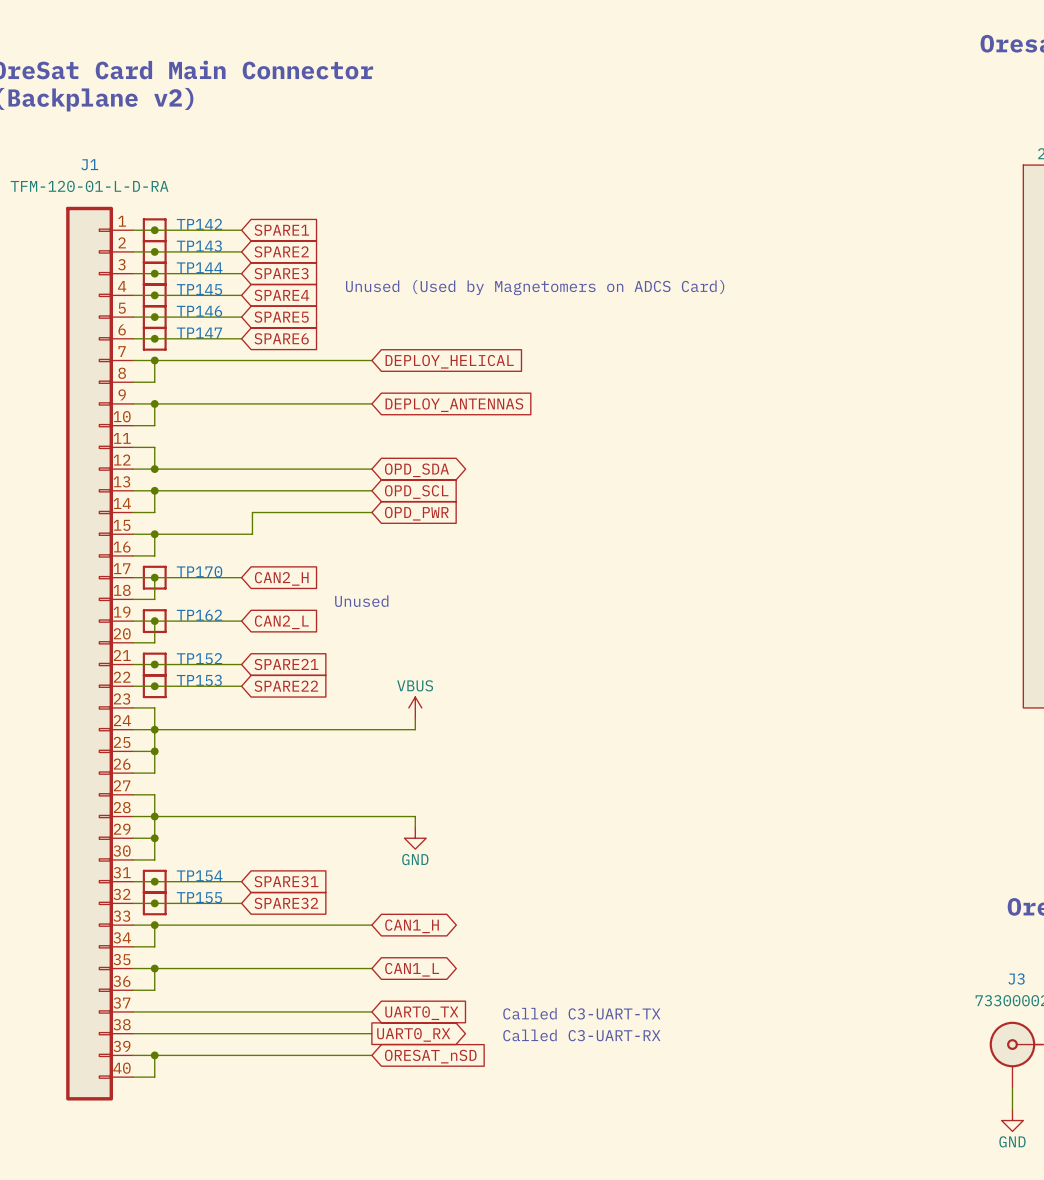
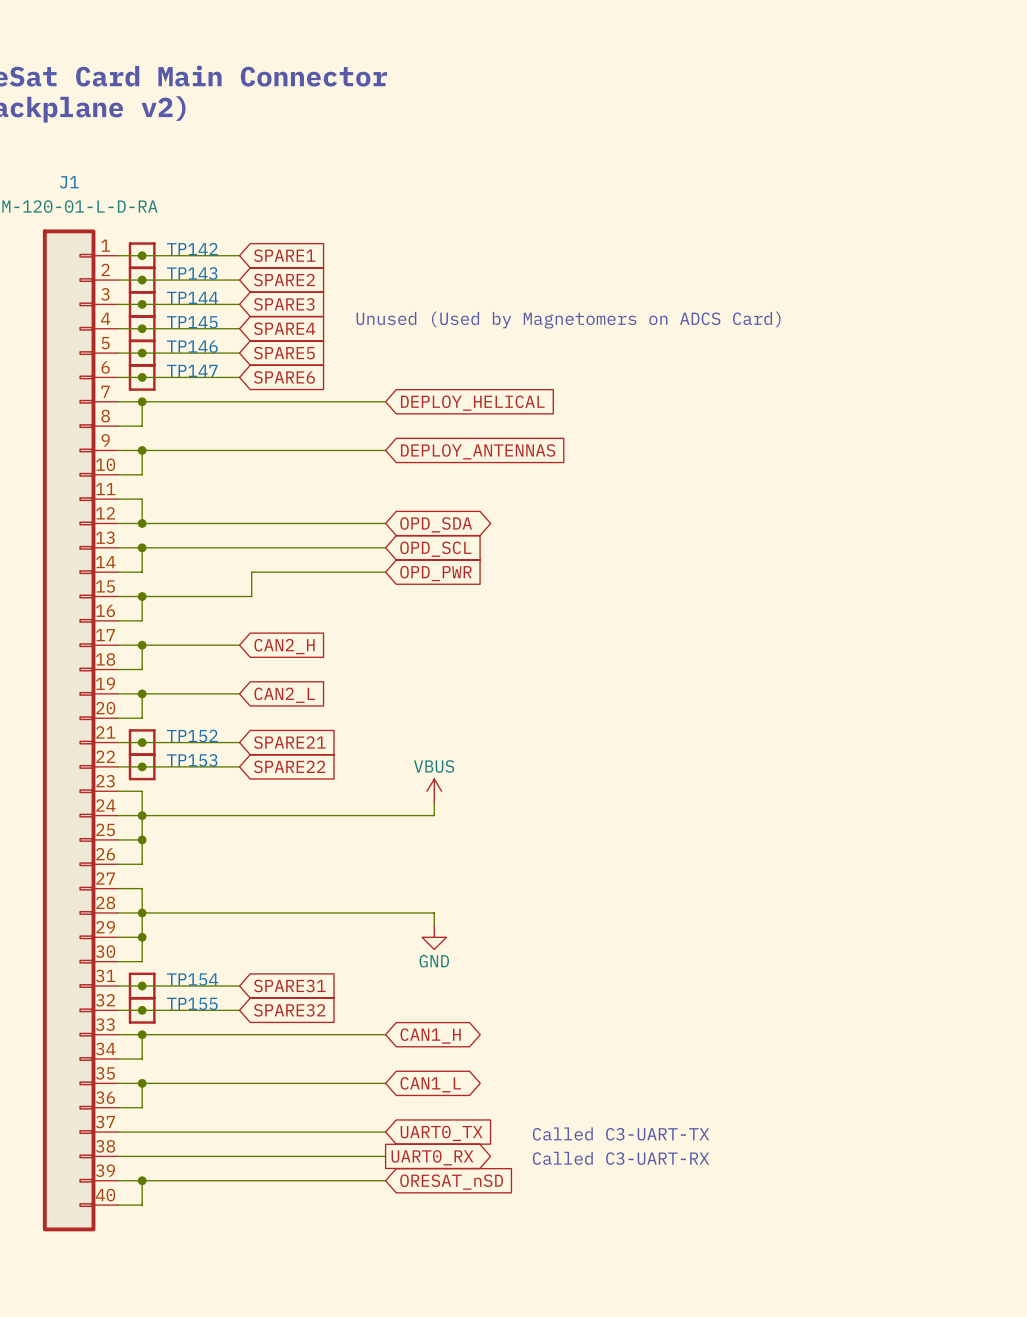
TP170: (154, 577) -> none
text: Unused (361, 601) -> none
TP162: (154, 621) -> none

